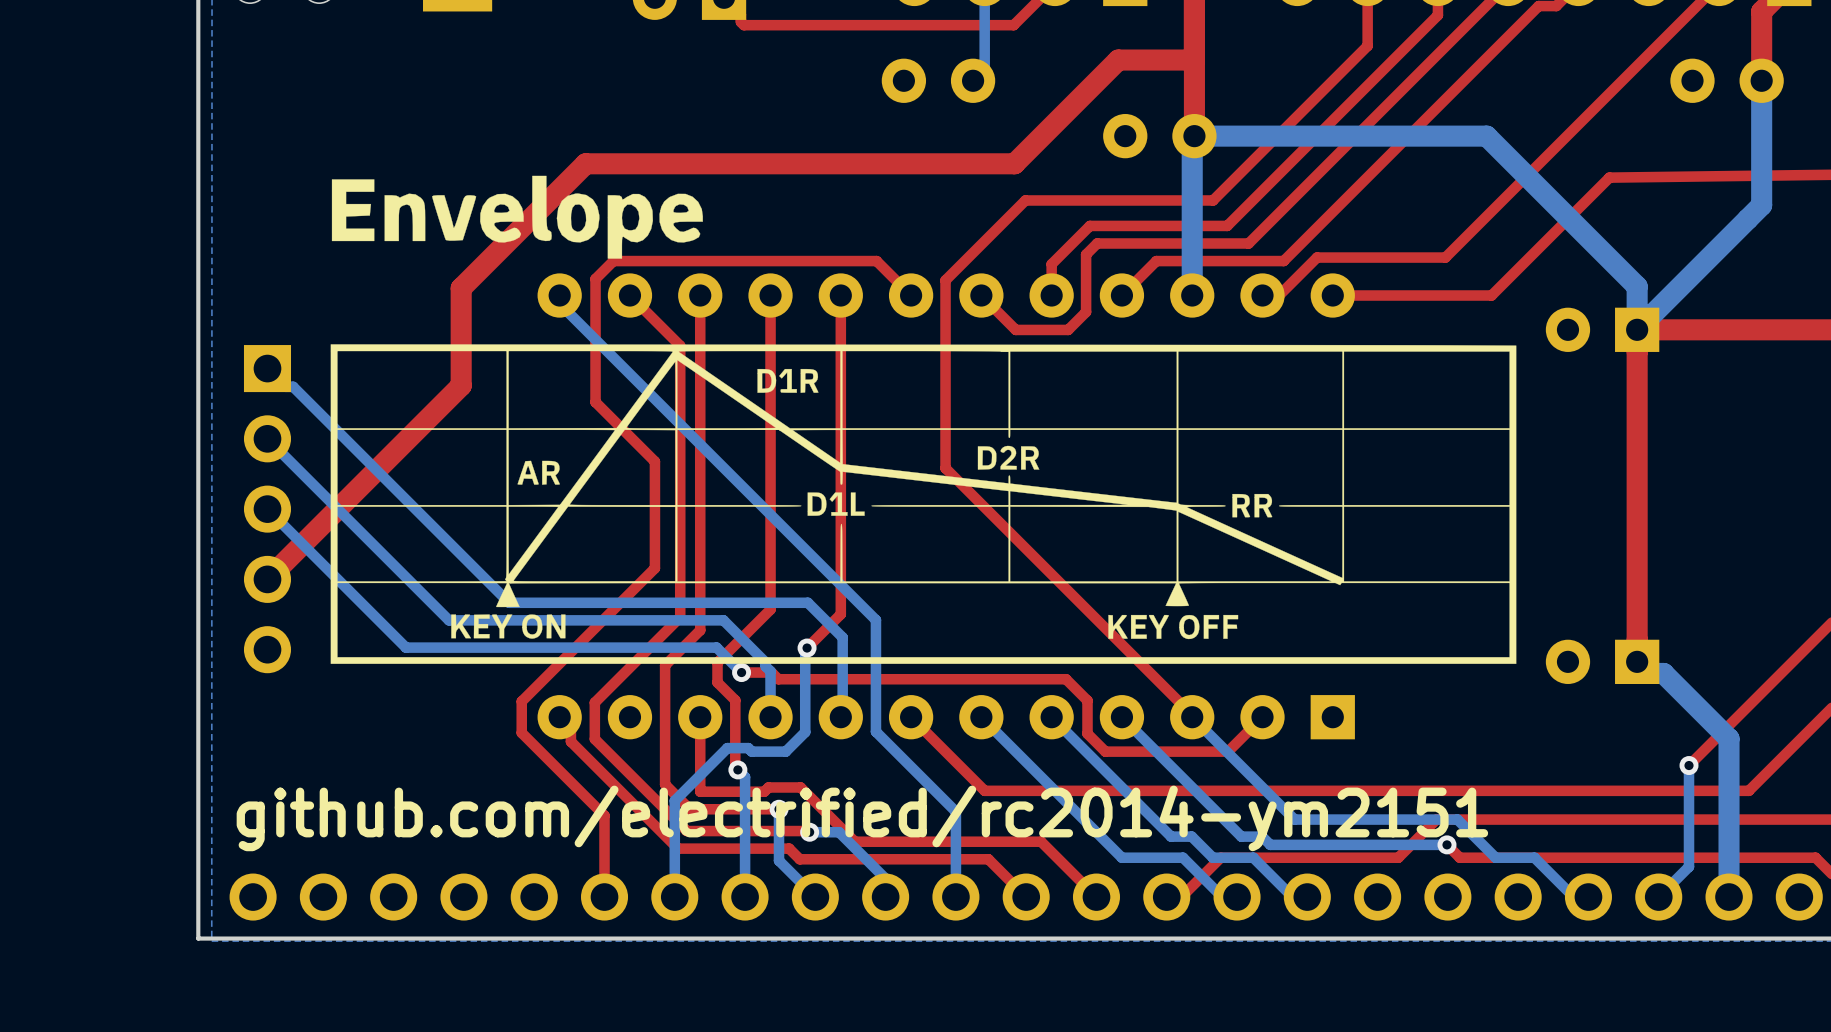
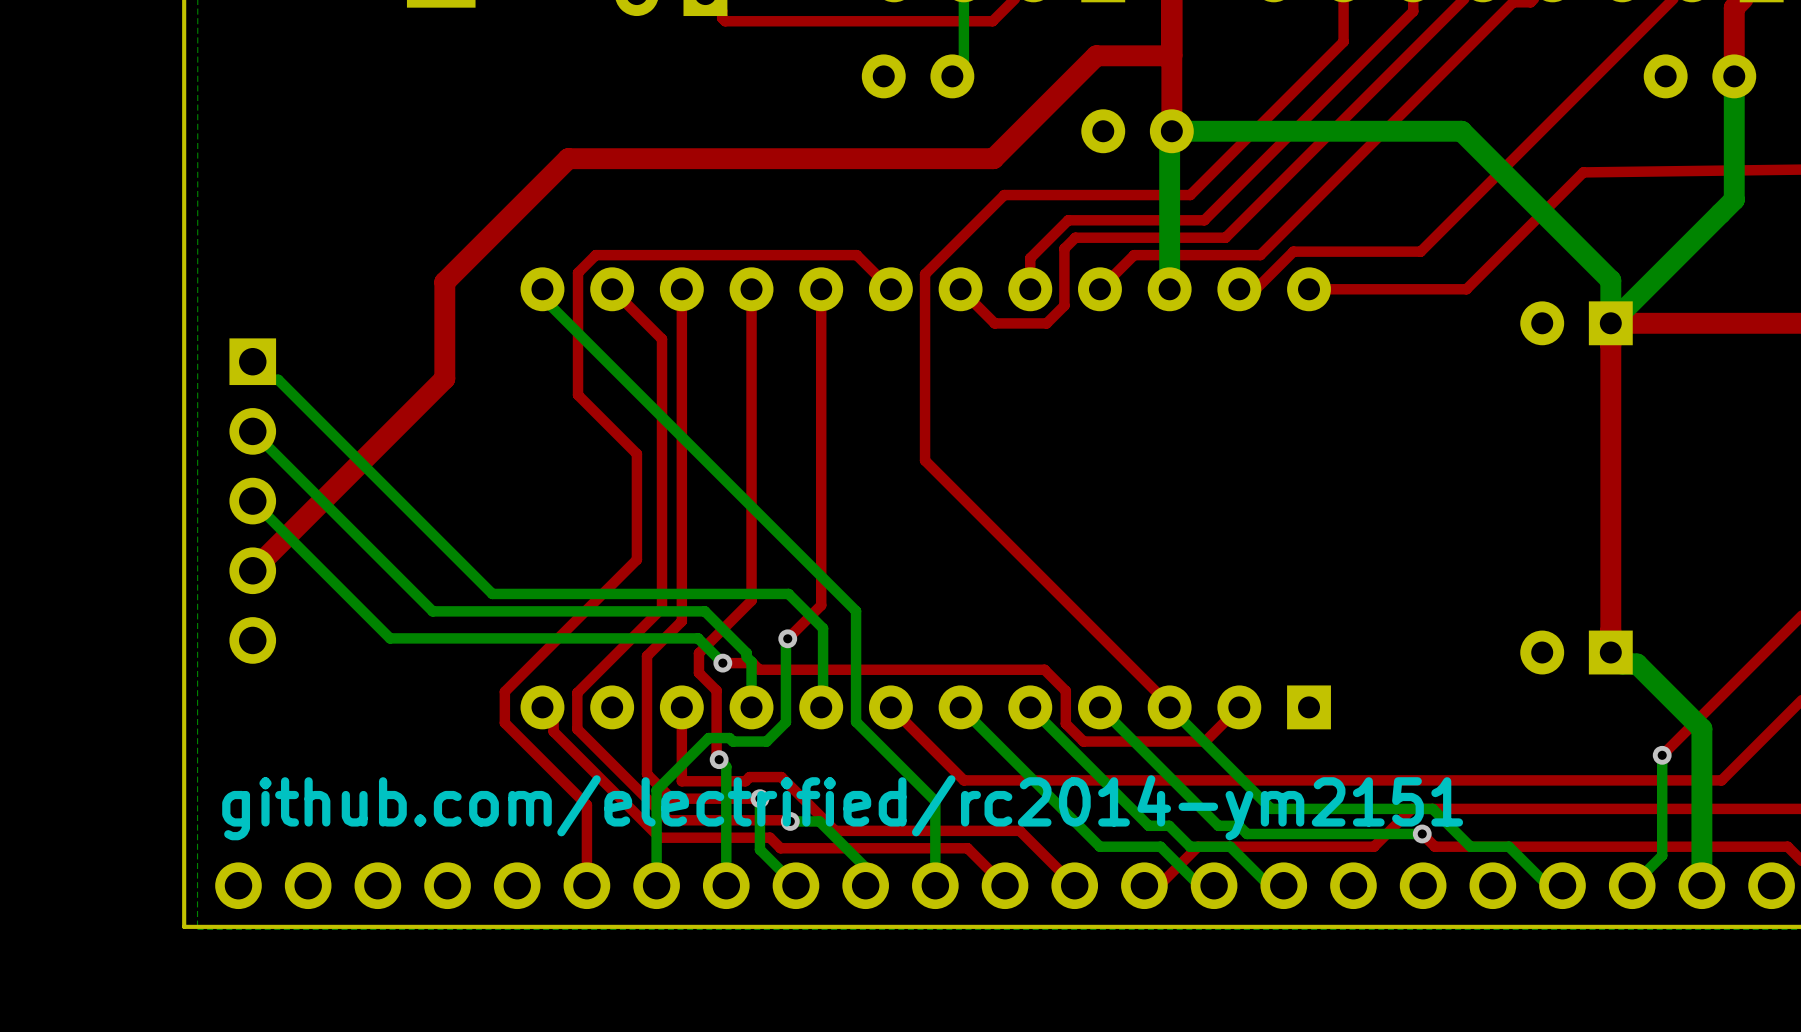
drawing: [331, 175, 703, 259] -> none
drawing: [330, 344, 1517, 664] -> none

